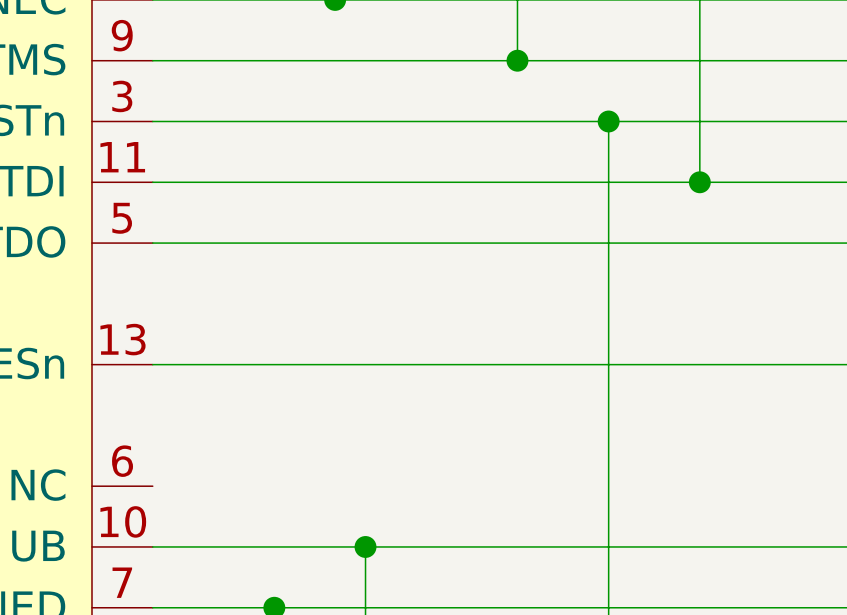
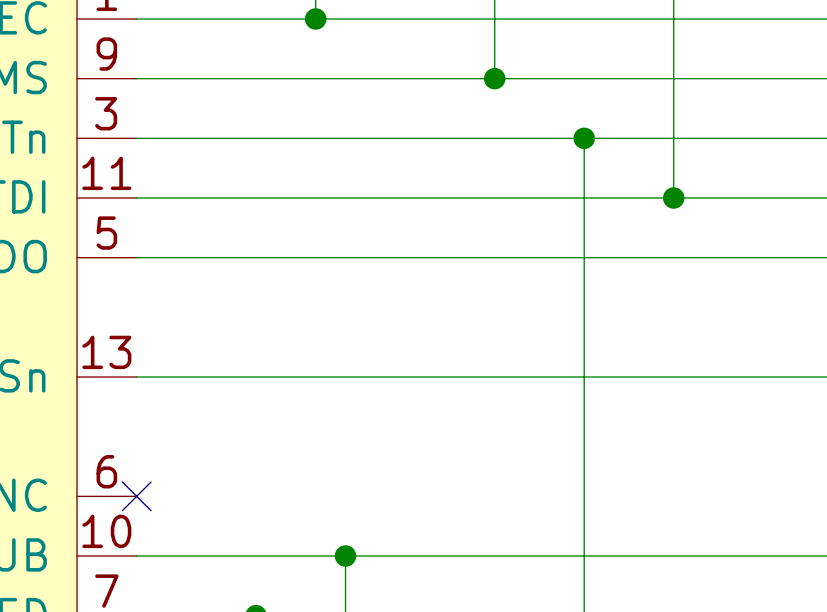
no-connect mark: none -> (136, 496)

